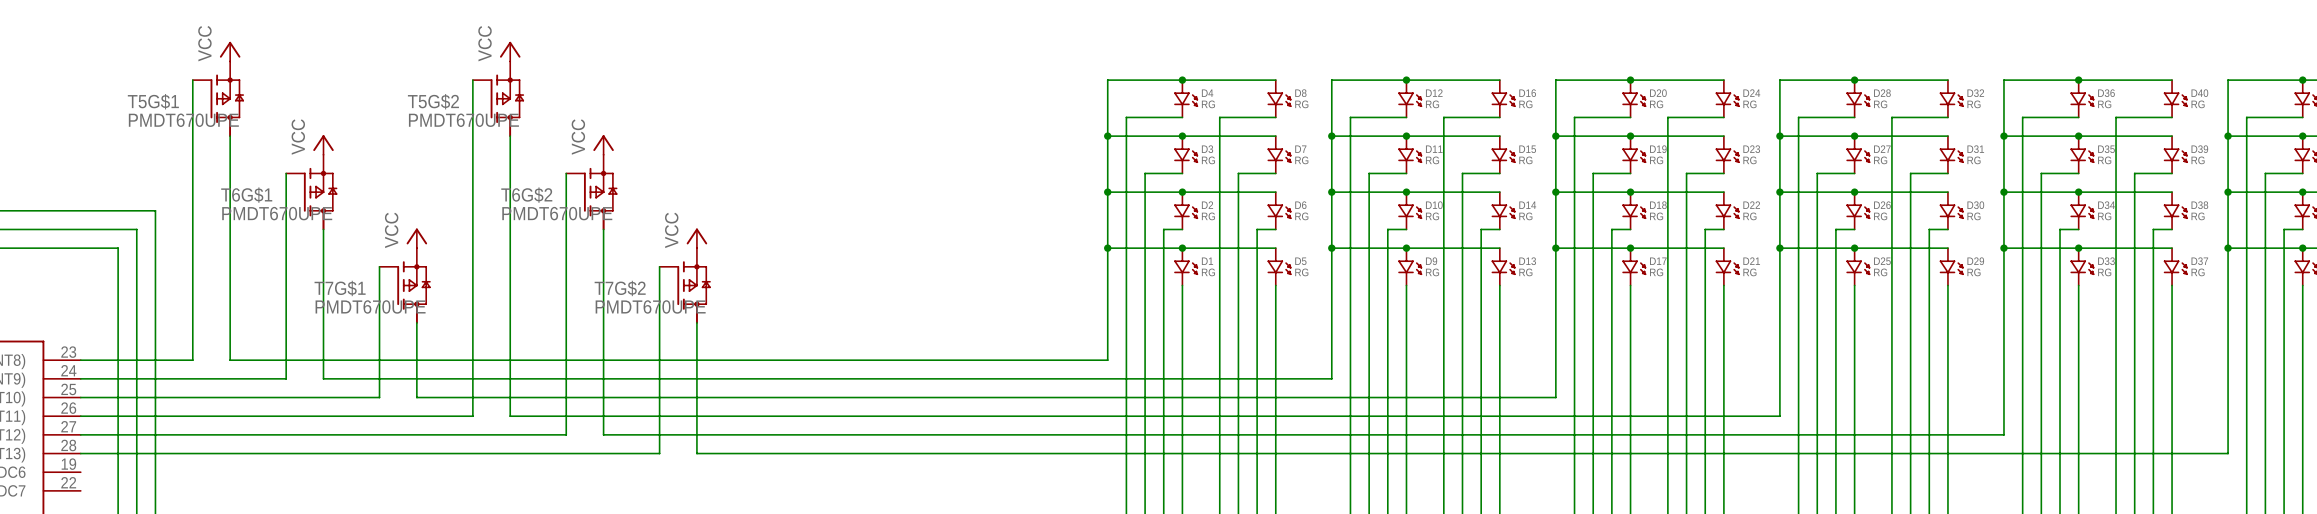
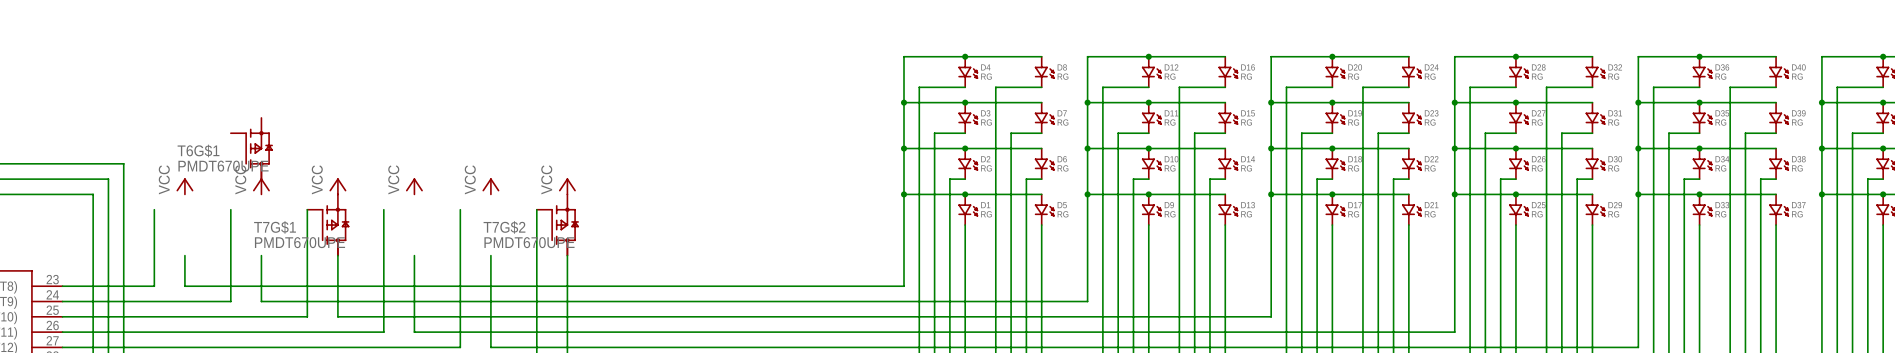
power symbol: VCC (230, 51) -> none
power symbol: VCC (510, 51) -> none
wire: (192, 80) (192, 266) -> none
wire: (472, 80) (472, 266) -> none
T5G$1: PMDT670UPE (218, 99) -> none
T5G$2: PMDT670UPE (498, 99) -> none
wire: (230, 136) (230, 322) -> none
wire: (510, 136) (510, 322) -> none
power symbol: VCC (323, 144) -> none
power symbol: VCC (603, 144) -> none
wire: (286, 173) (286, 266) -> none
wire: (566, 173) (566, 266) -> none
T6G$2: PMDT670UPE (591, 192) -> none
wire: (323, 229) (323, 322) -> none
wire: (603, 229) (603, 322) -> none
power symbol: none -> VCC (184, 186)
power symbol: none -> VCC (261, 186)
power symbol: none -> VCC (414, 186)
power symbol: none -> VCC (490, 186)

